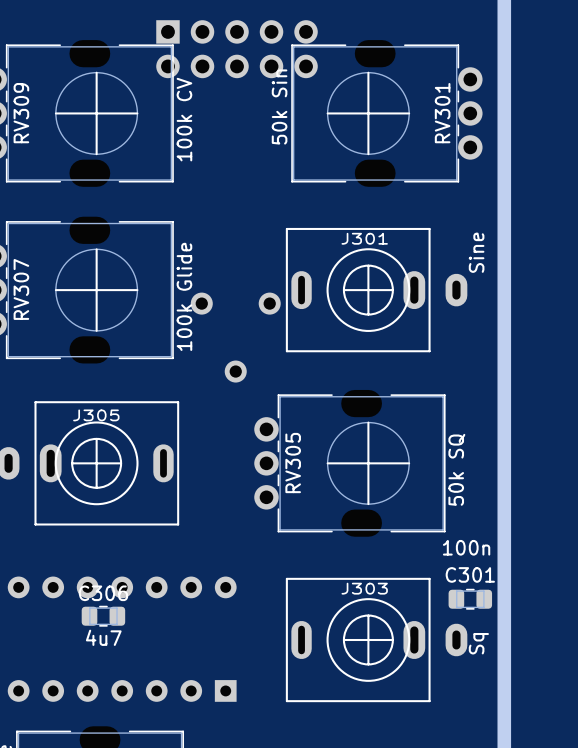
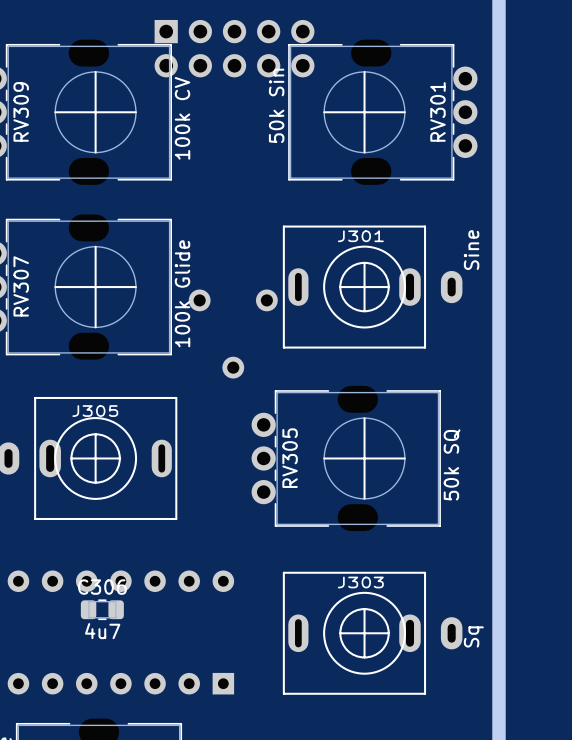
C301: 100n (470, 599) -> none

